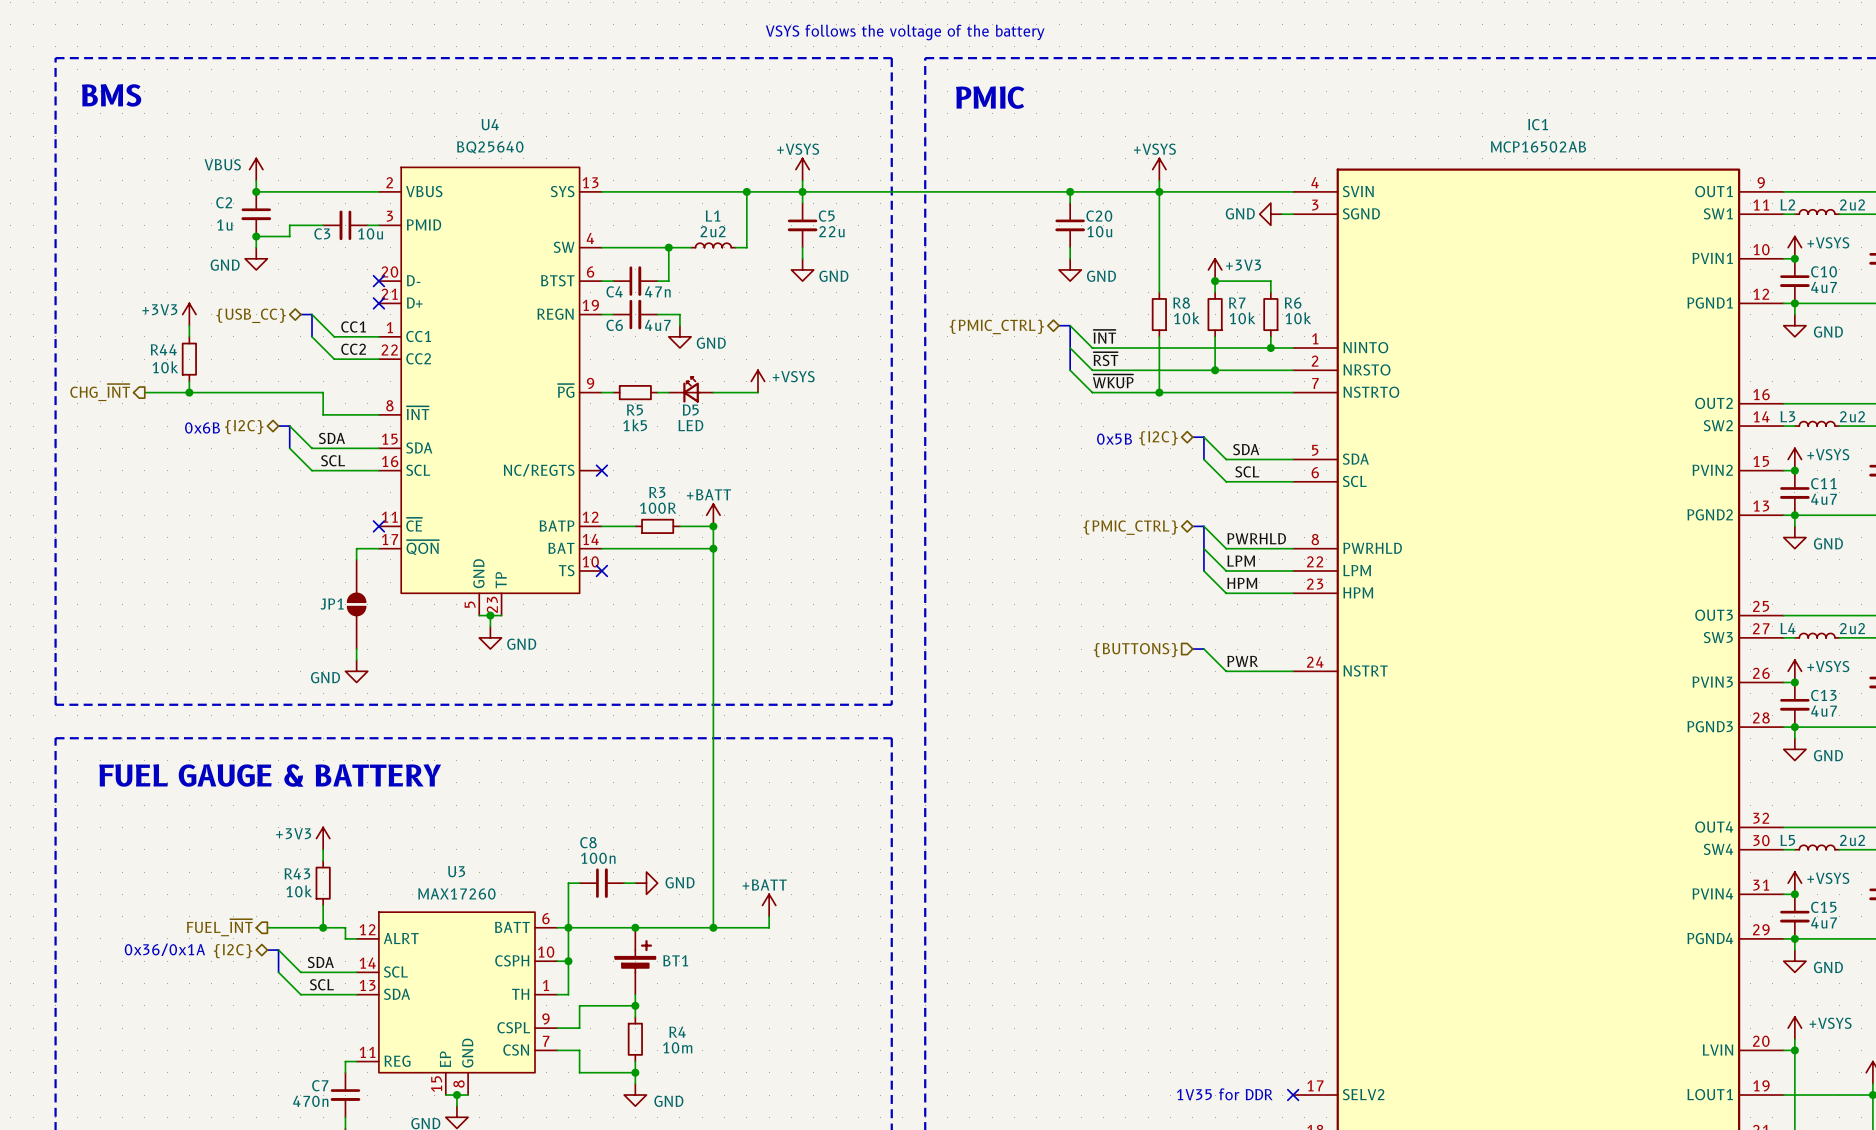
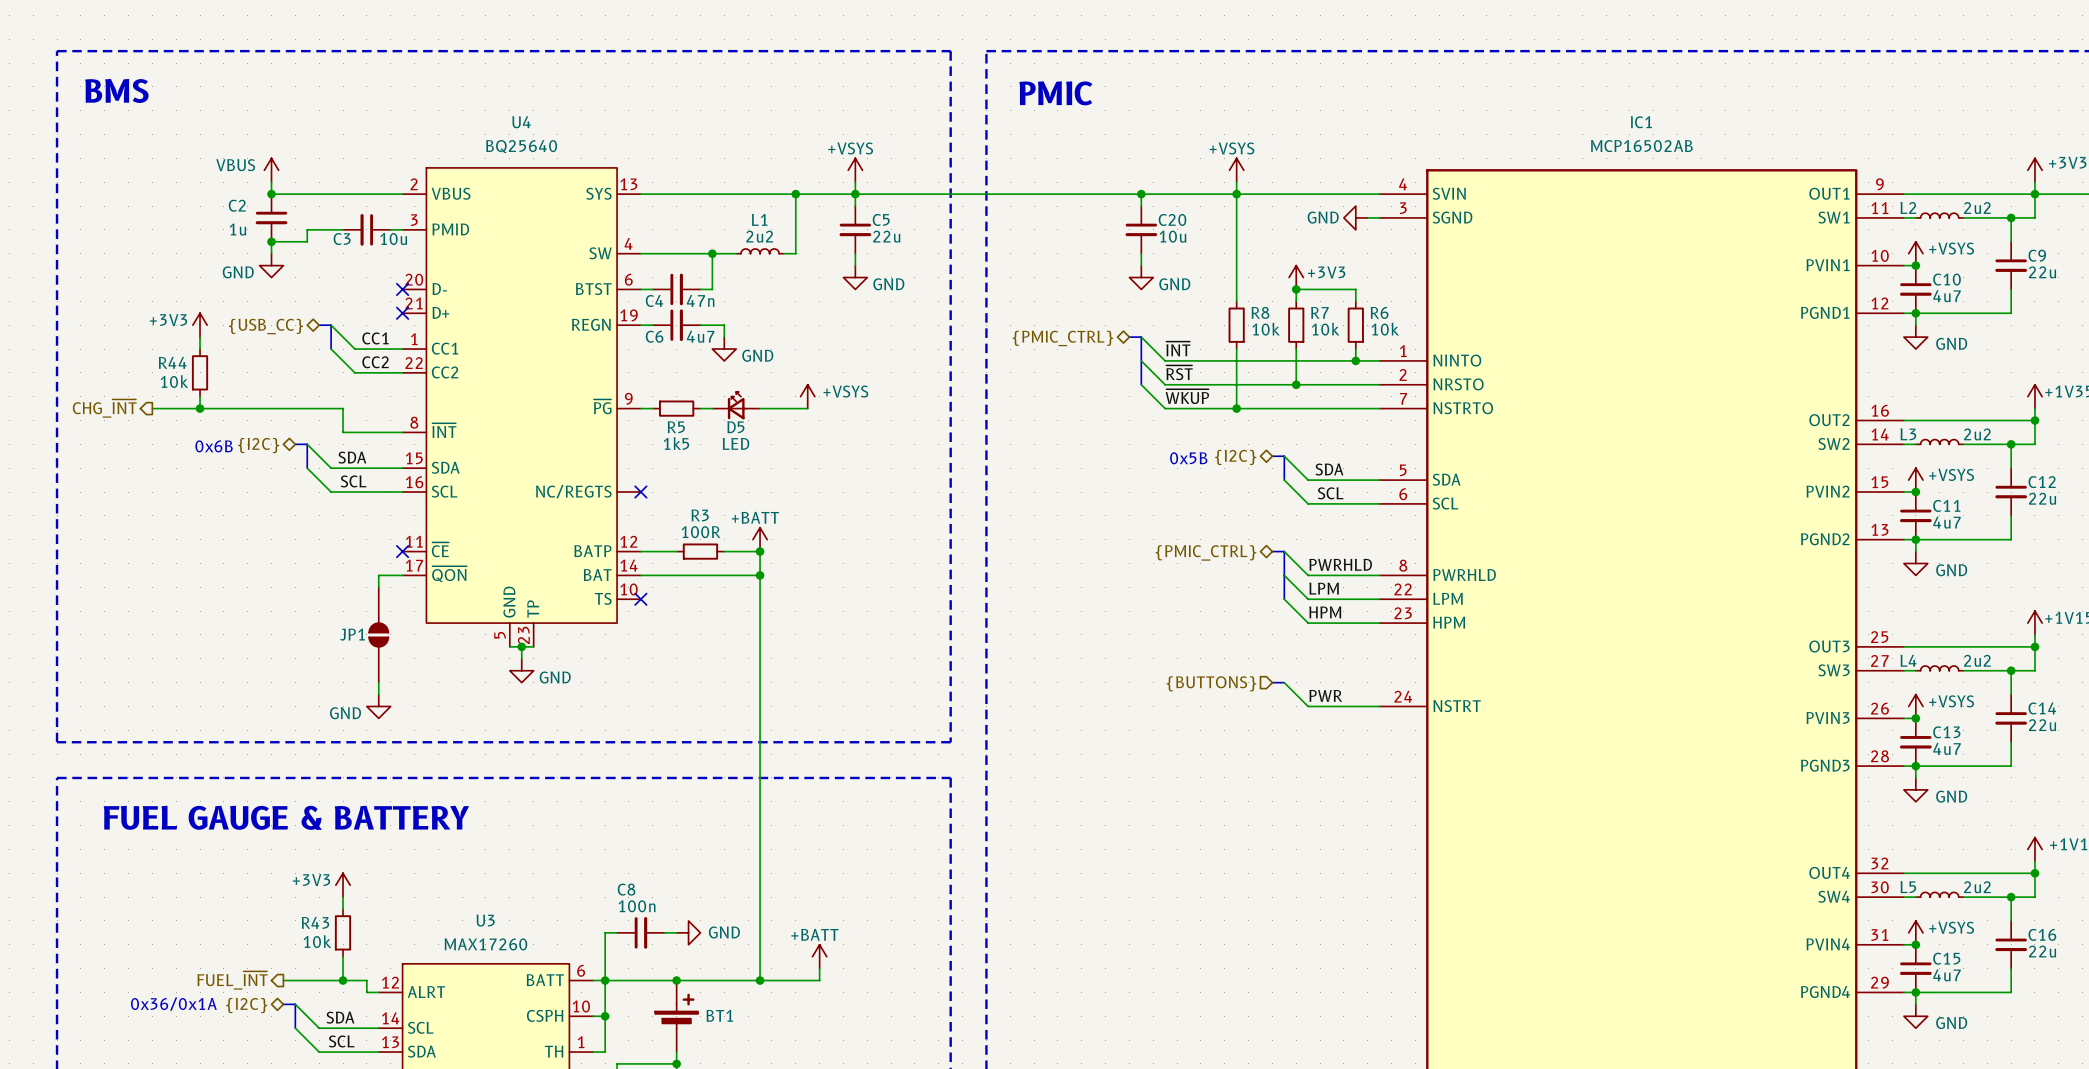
text: VSYS follows the voltage of the battery (905, 32) -> none

